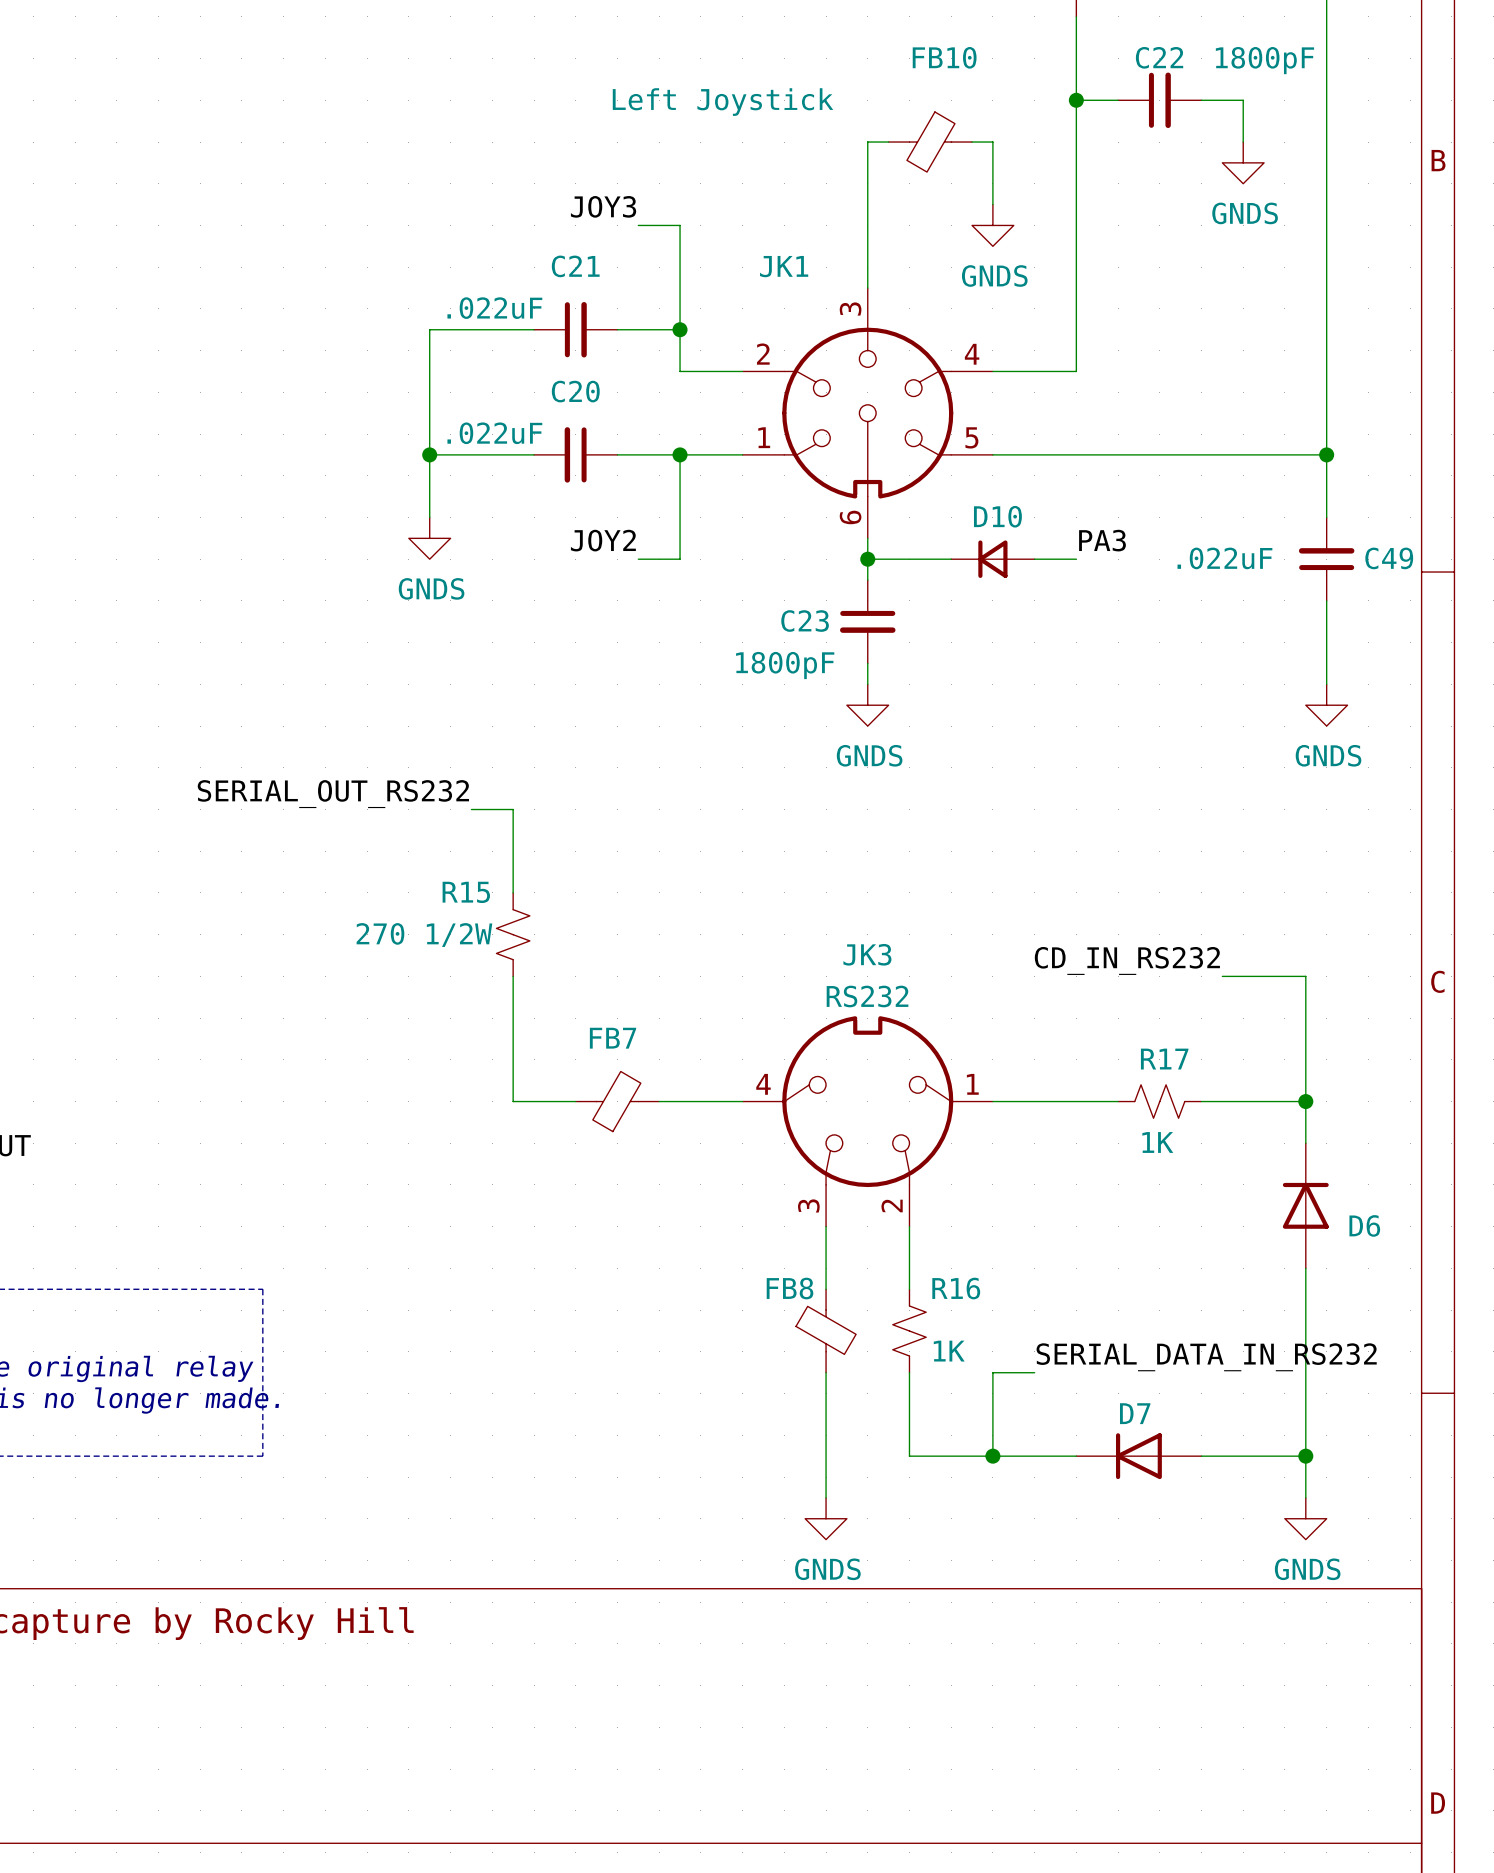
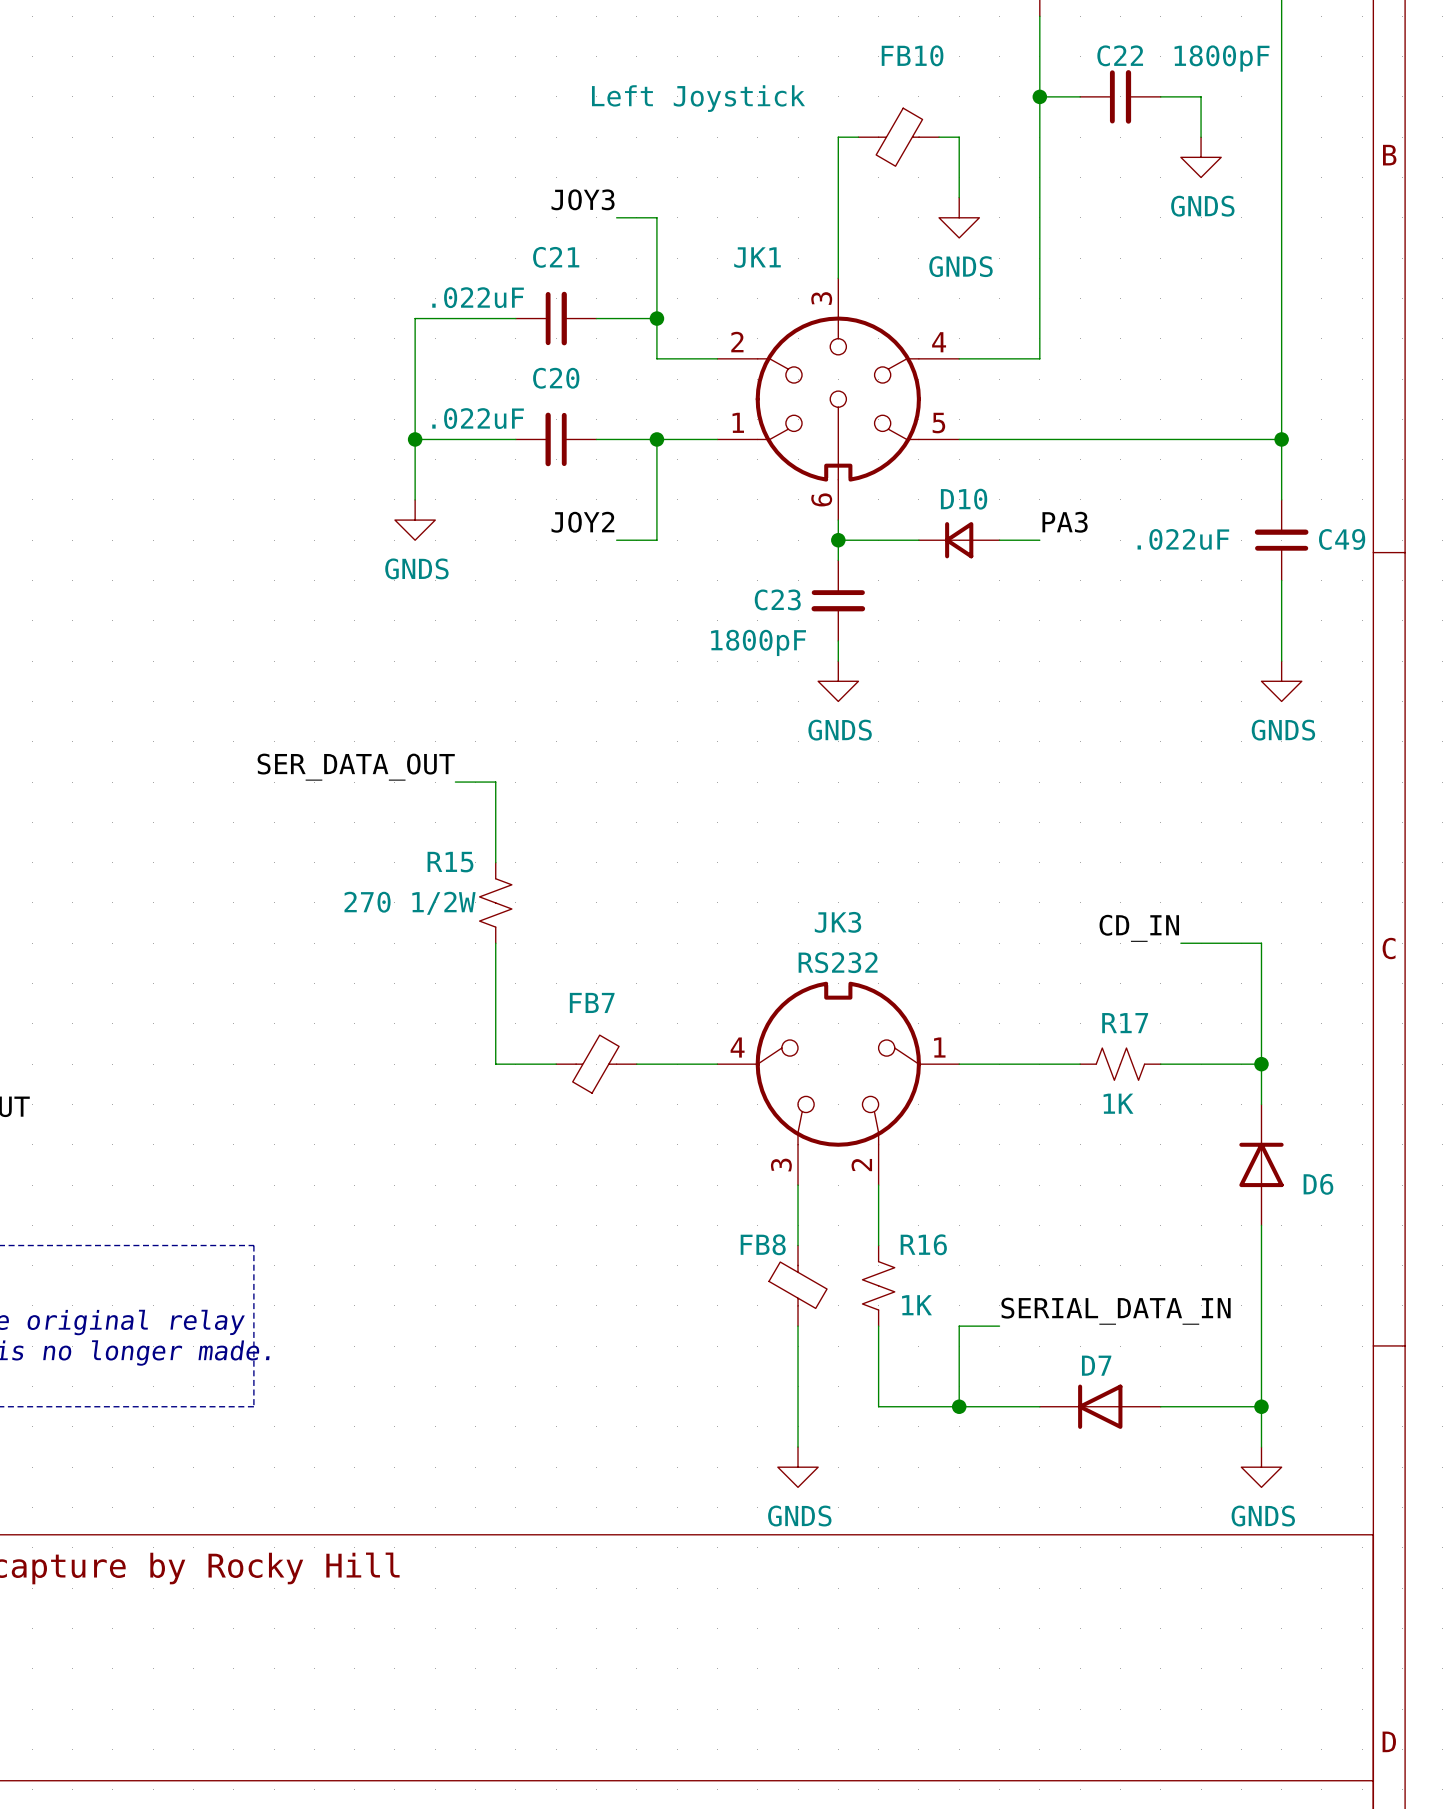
label: SERIAL_OUT_RS232 (333, 794) -> SER_DATA_OUT (356, 767)
label: CD_IN_RS232 (1127, 960) -> CD_IN (1139, 928)
label: SERIAL_DATA_IN_RS232 (1206, 1357) -> SERIAL_DATA_IN (1116, 1311)

